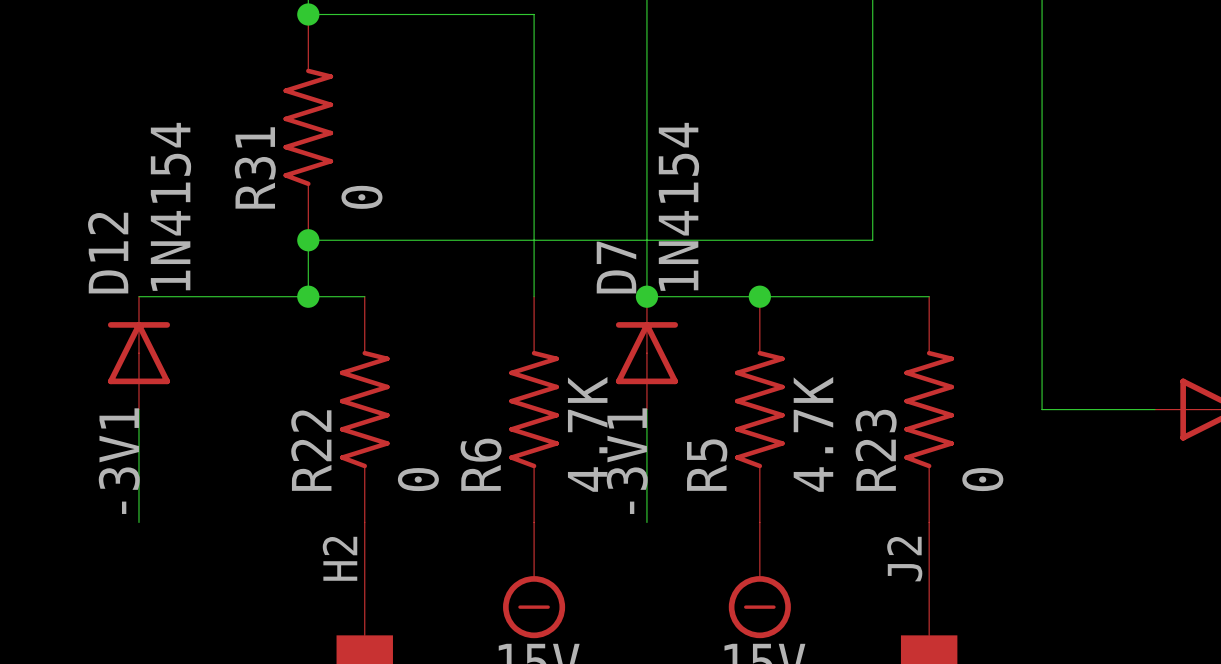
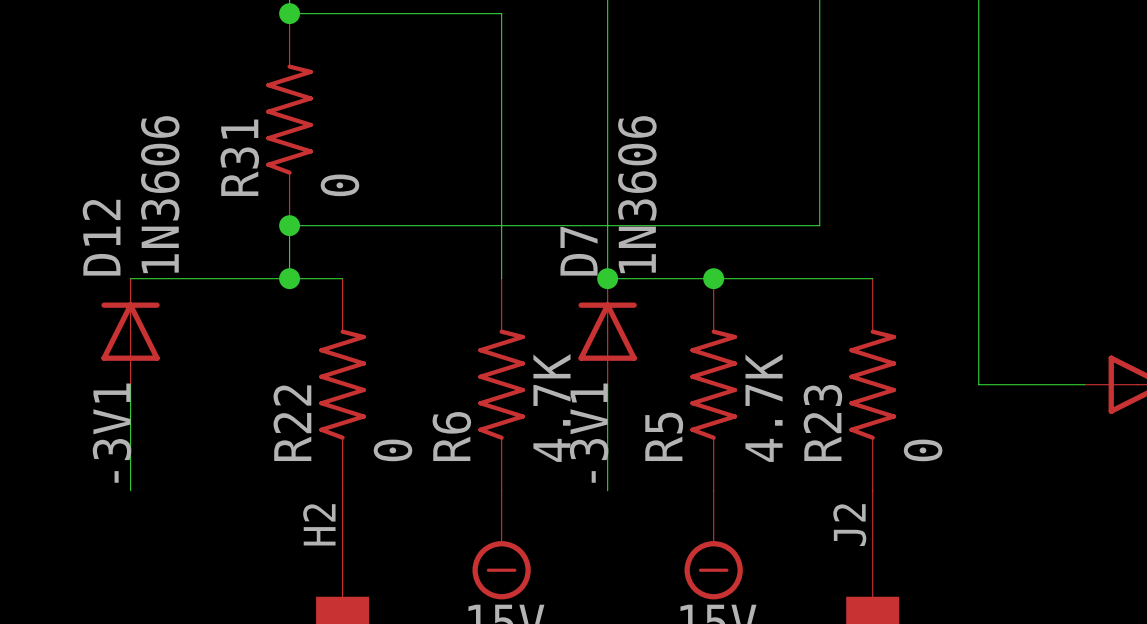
D12 value: 1N4154 (170, 206) -> 1N3606 (160, 194)
D7 value: 1N4154 (678, 206) -> 1N3606 (637, 194)

